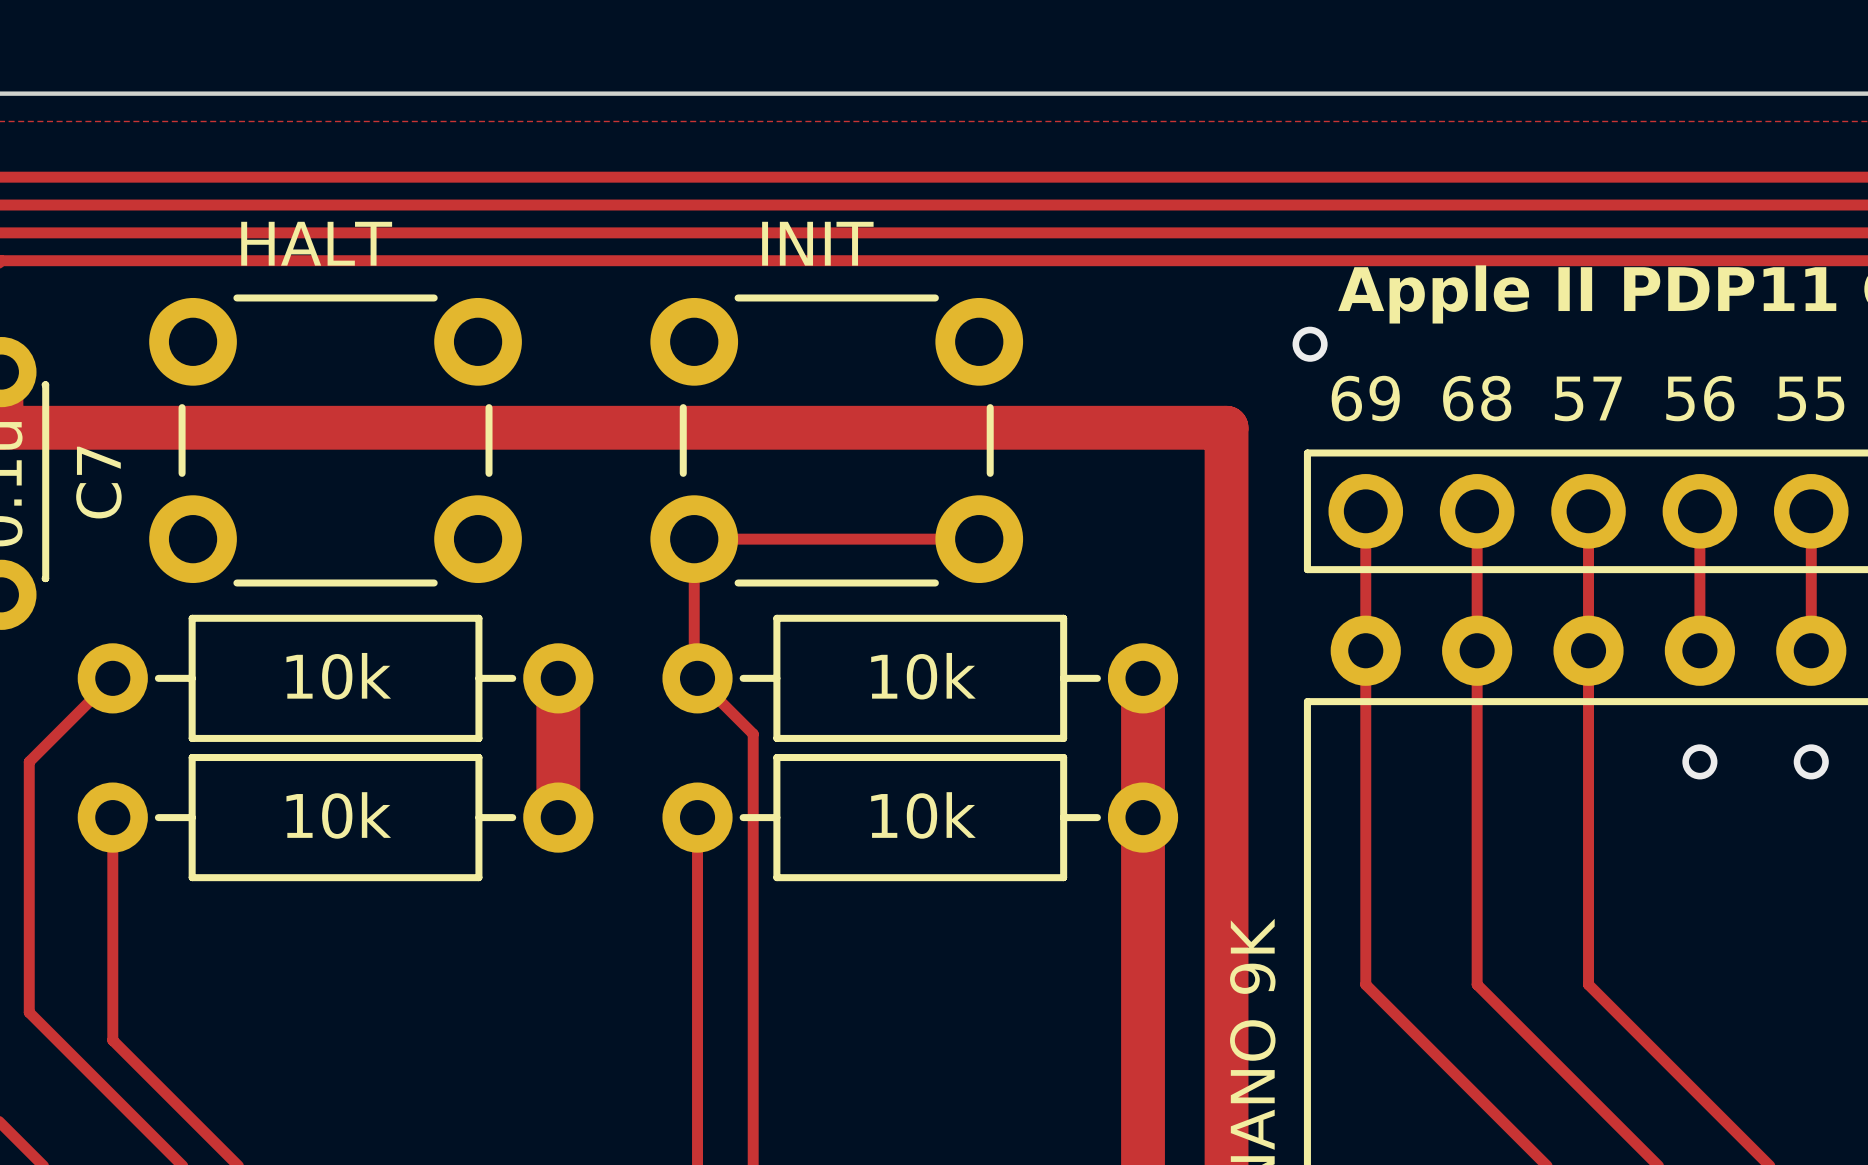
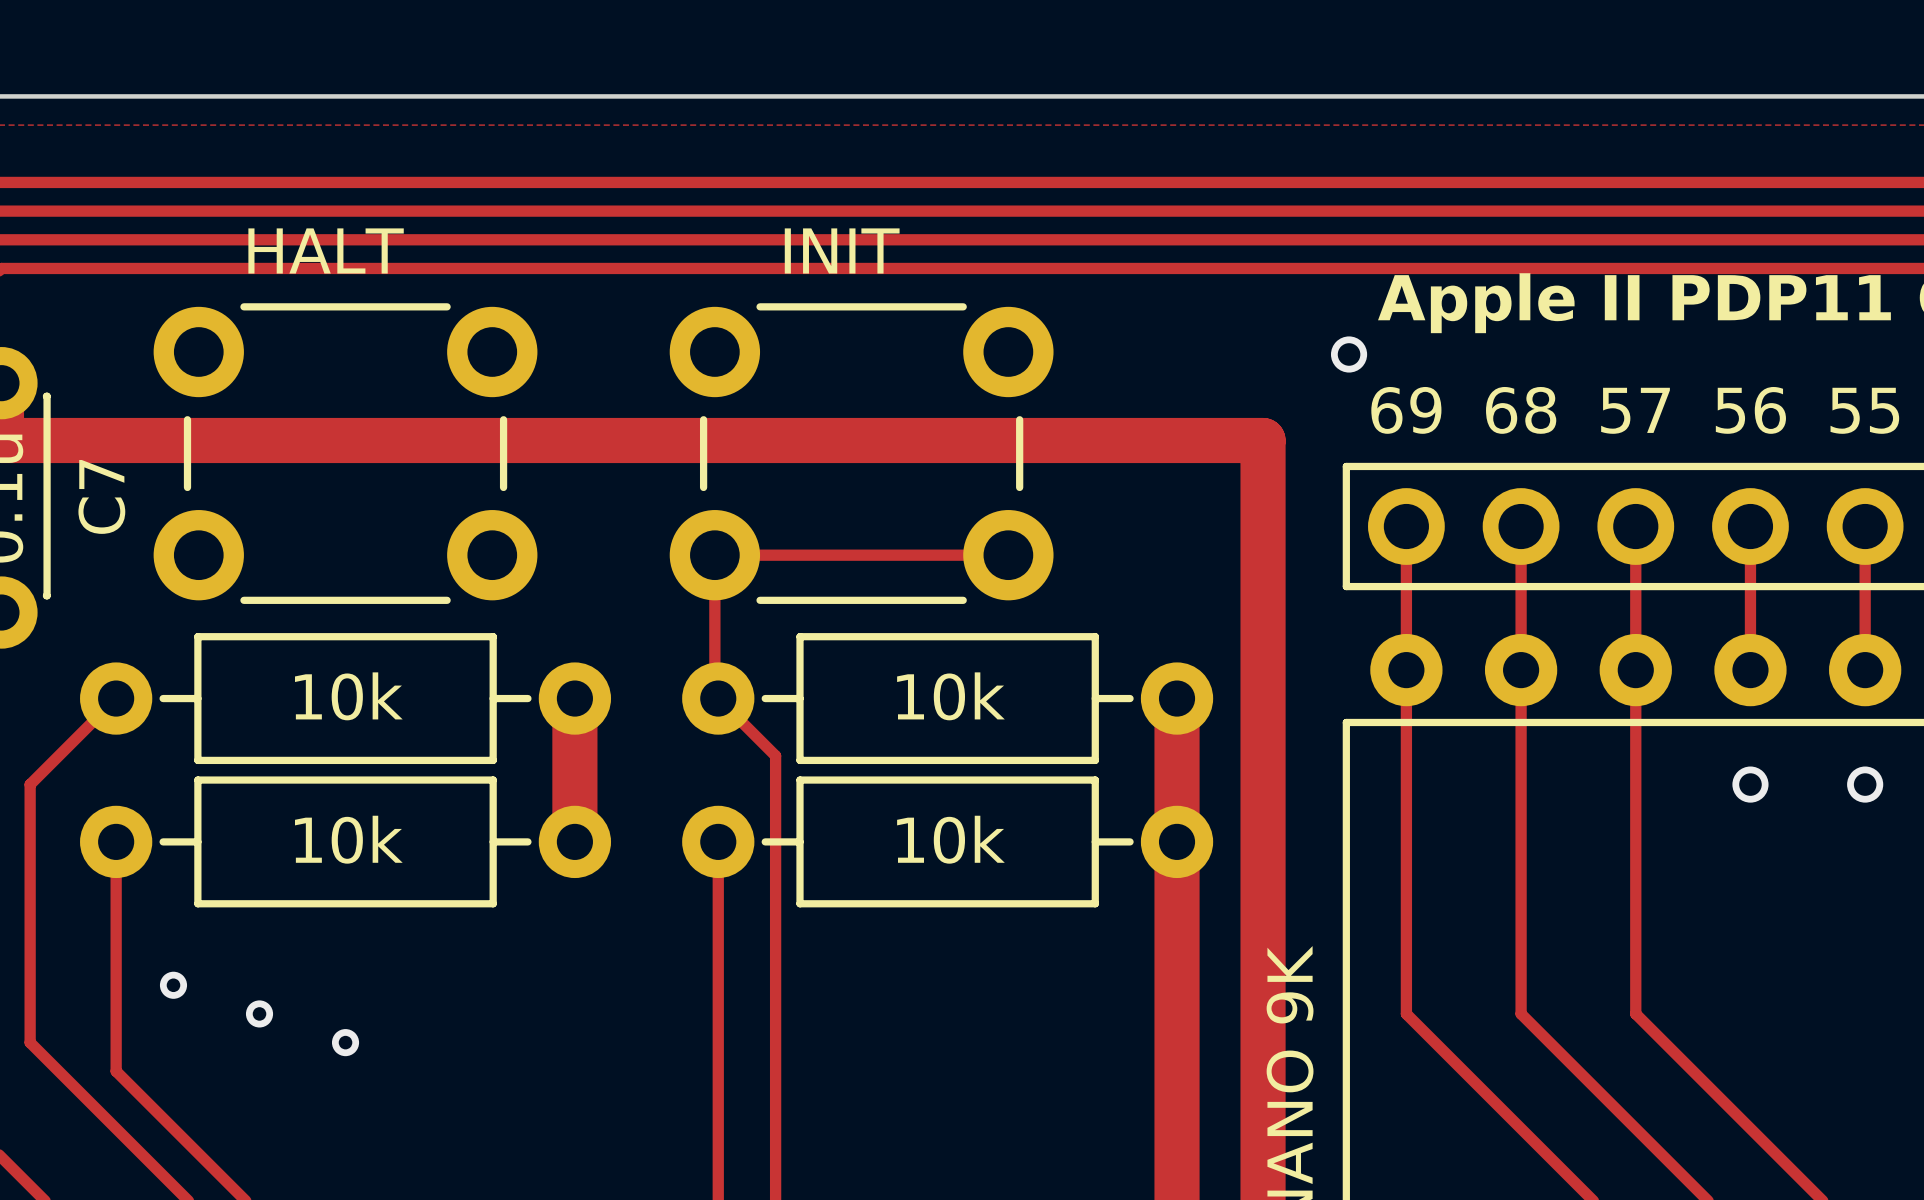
via: none -> (173, 985)
via: none -> (259, 1013)
via: none -> (345, 1042)

